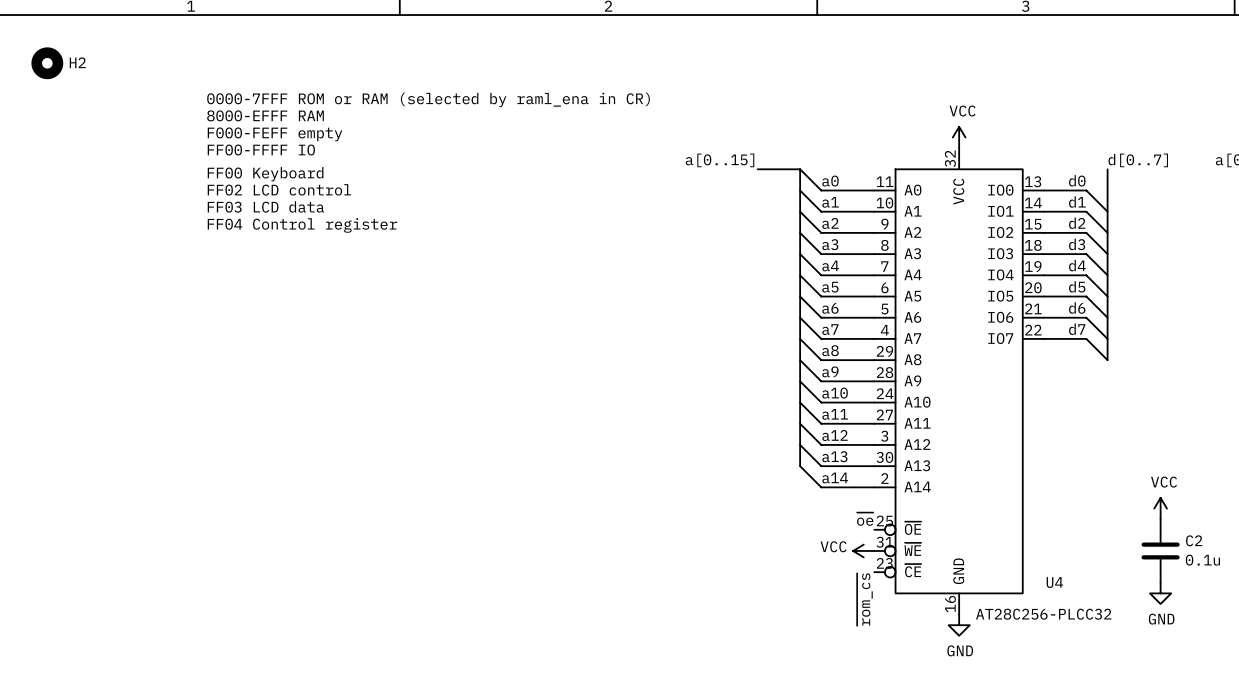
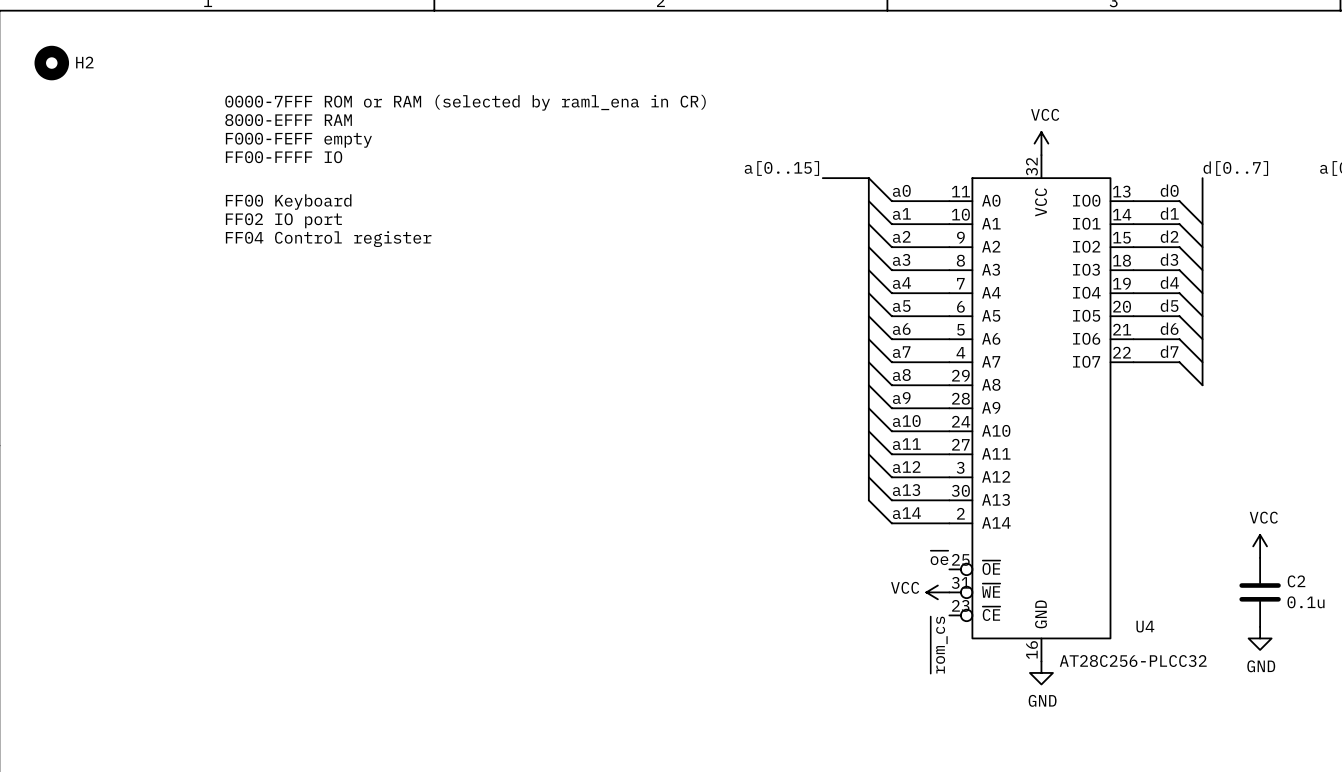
text: FF00 Keyboard (265, 174) -> none
text: FF02 LCD control (279, 189) -> FF00 Keyboard (288, 201)
text: FF03 LCD data (265, 206) -> FF02 IO port (283, 220)

